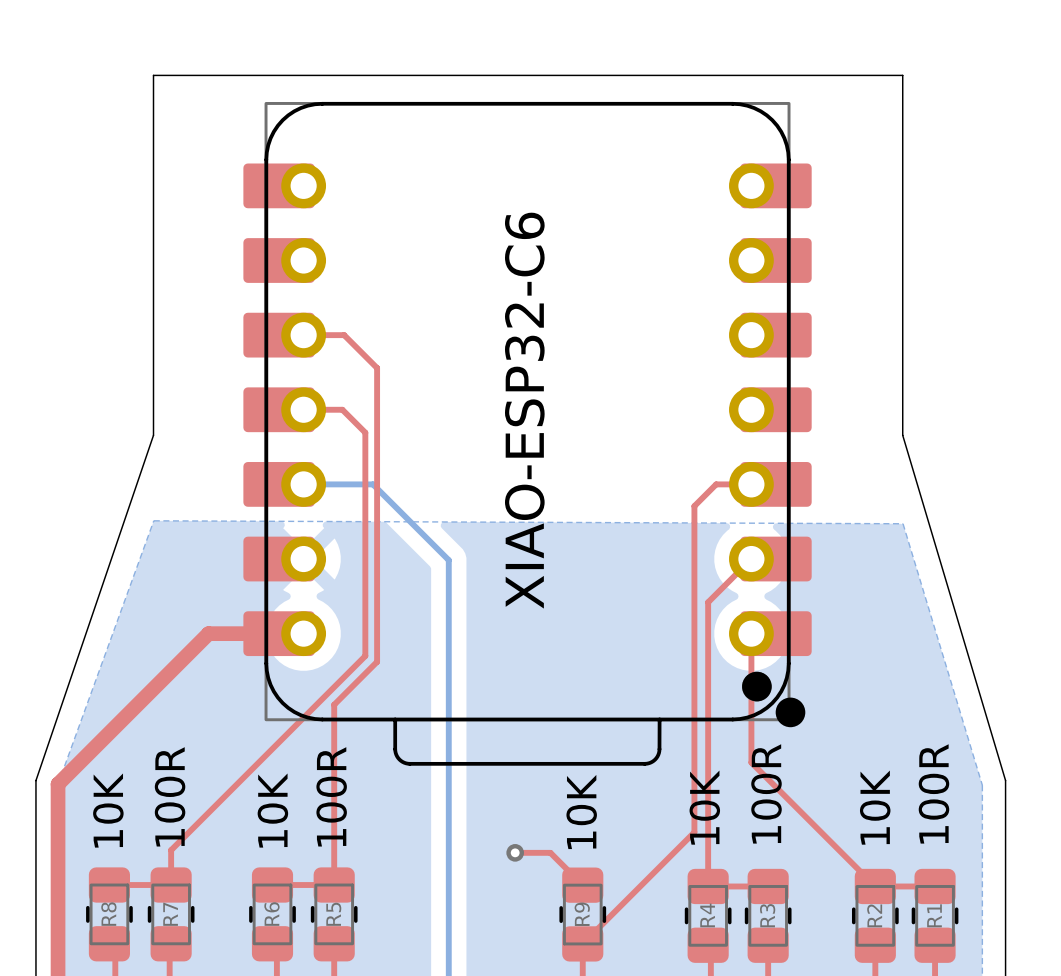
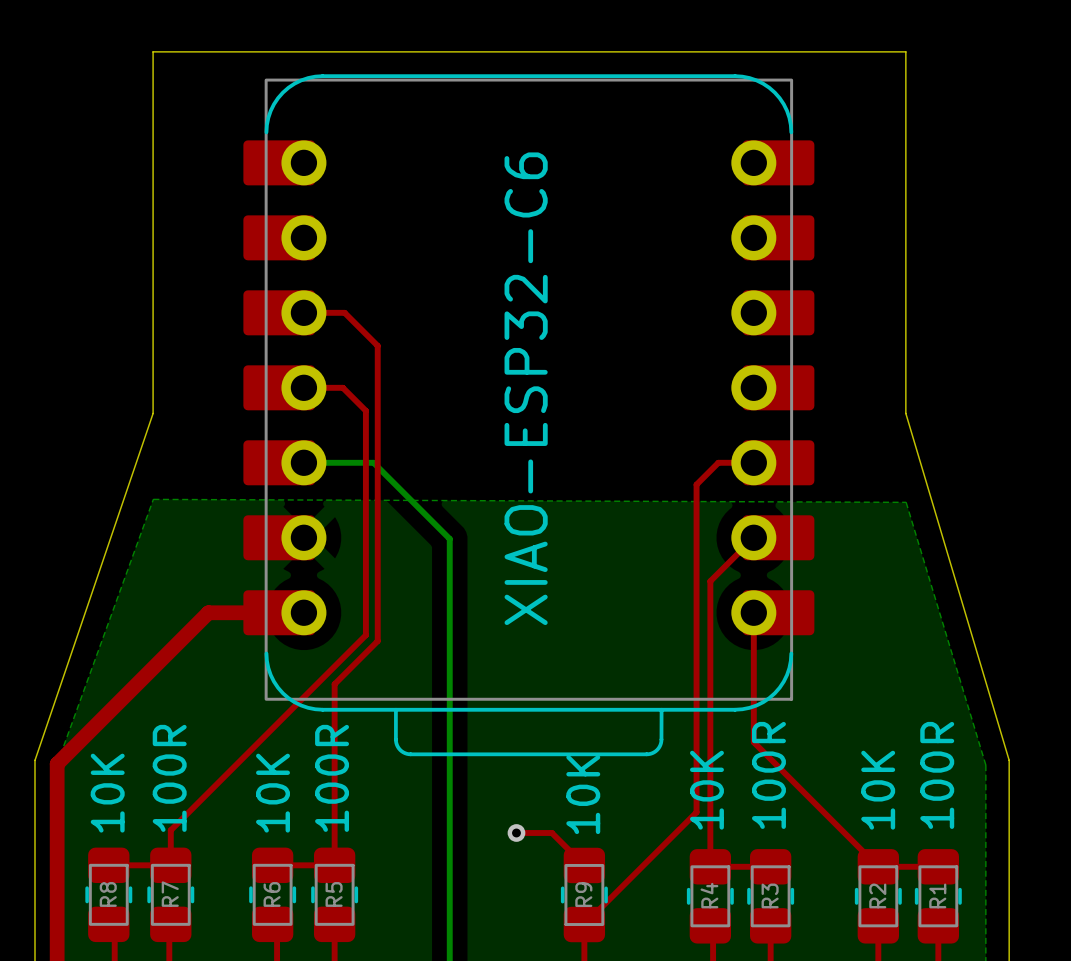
part footprint: [243, 101, 812, 766] -> [243, 74, 815, 757]

